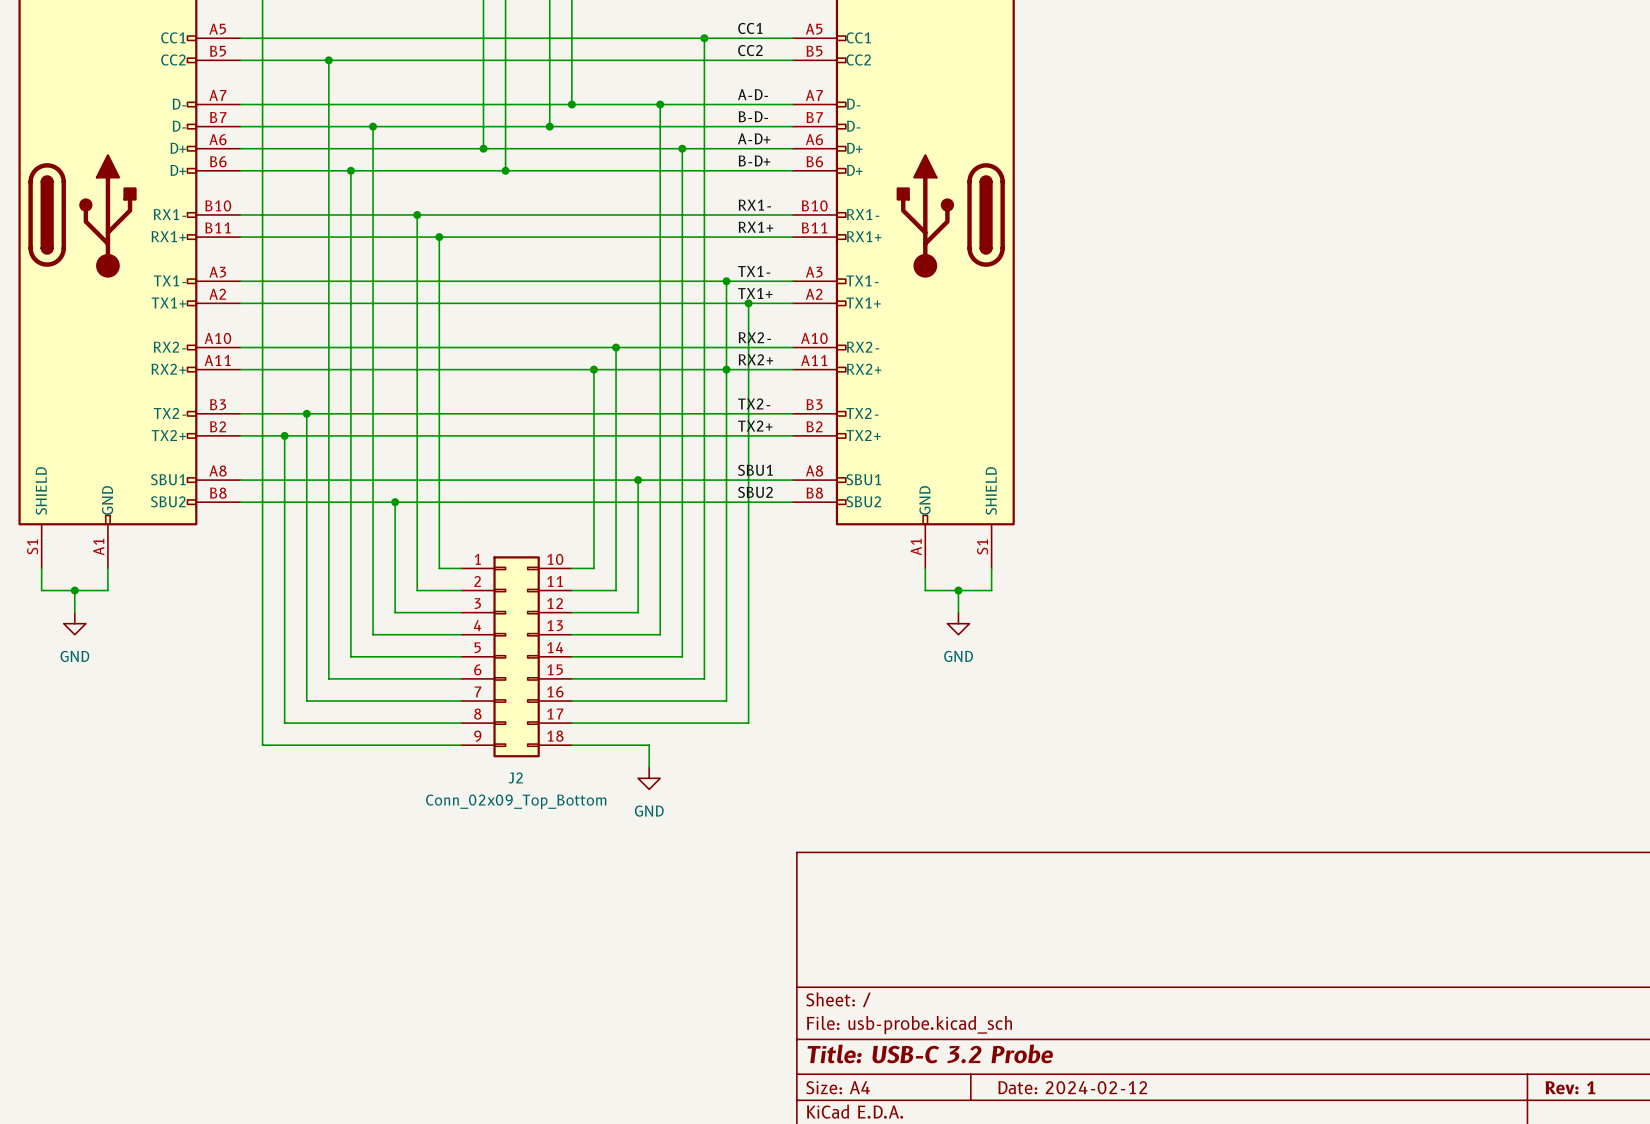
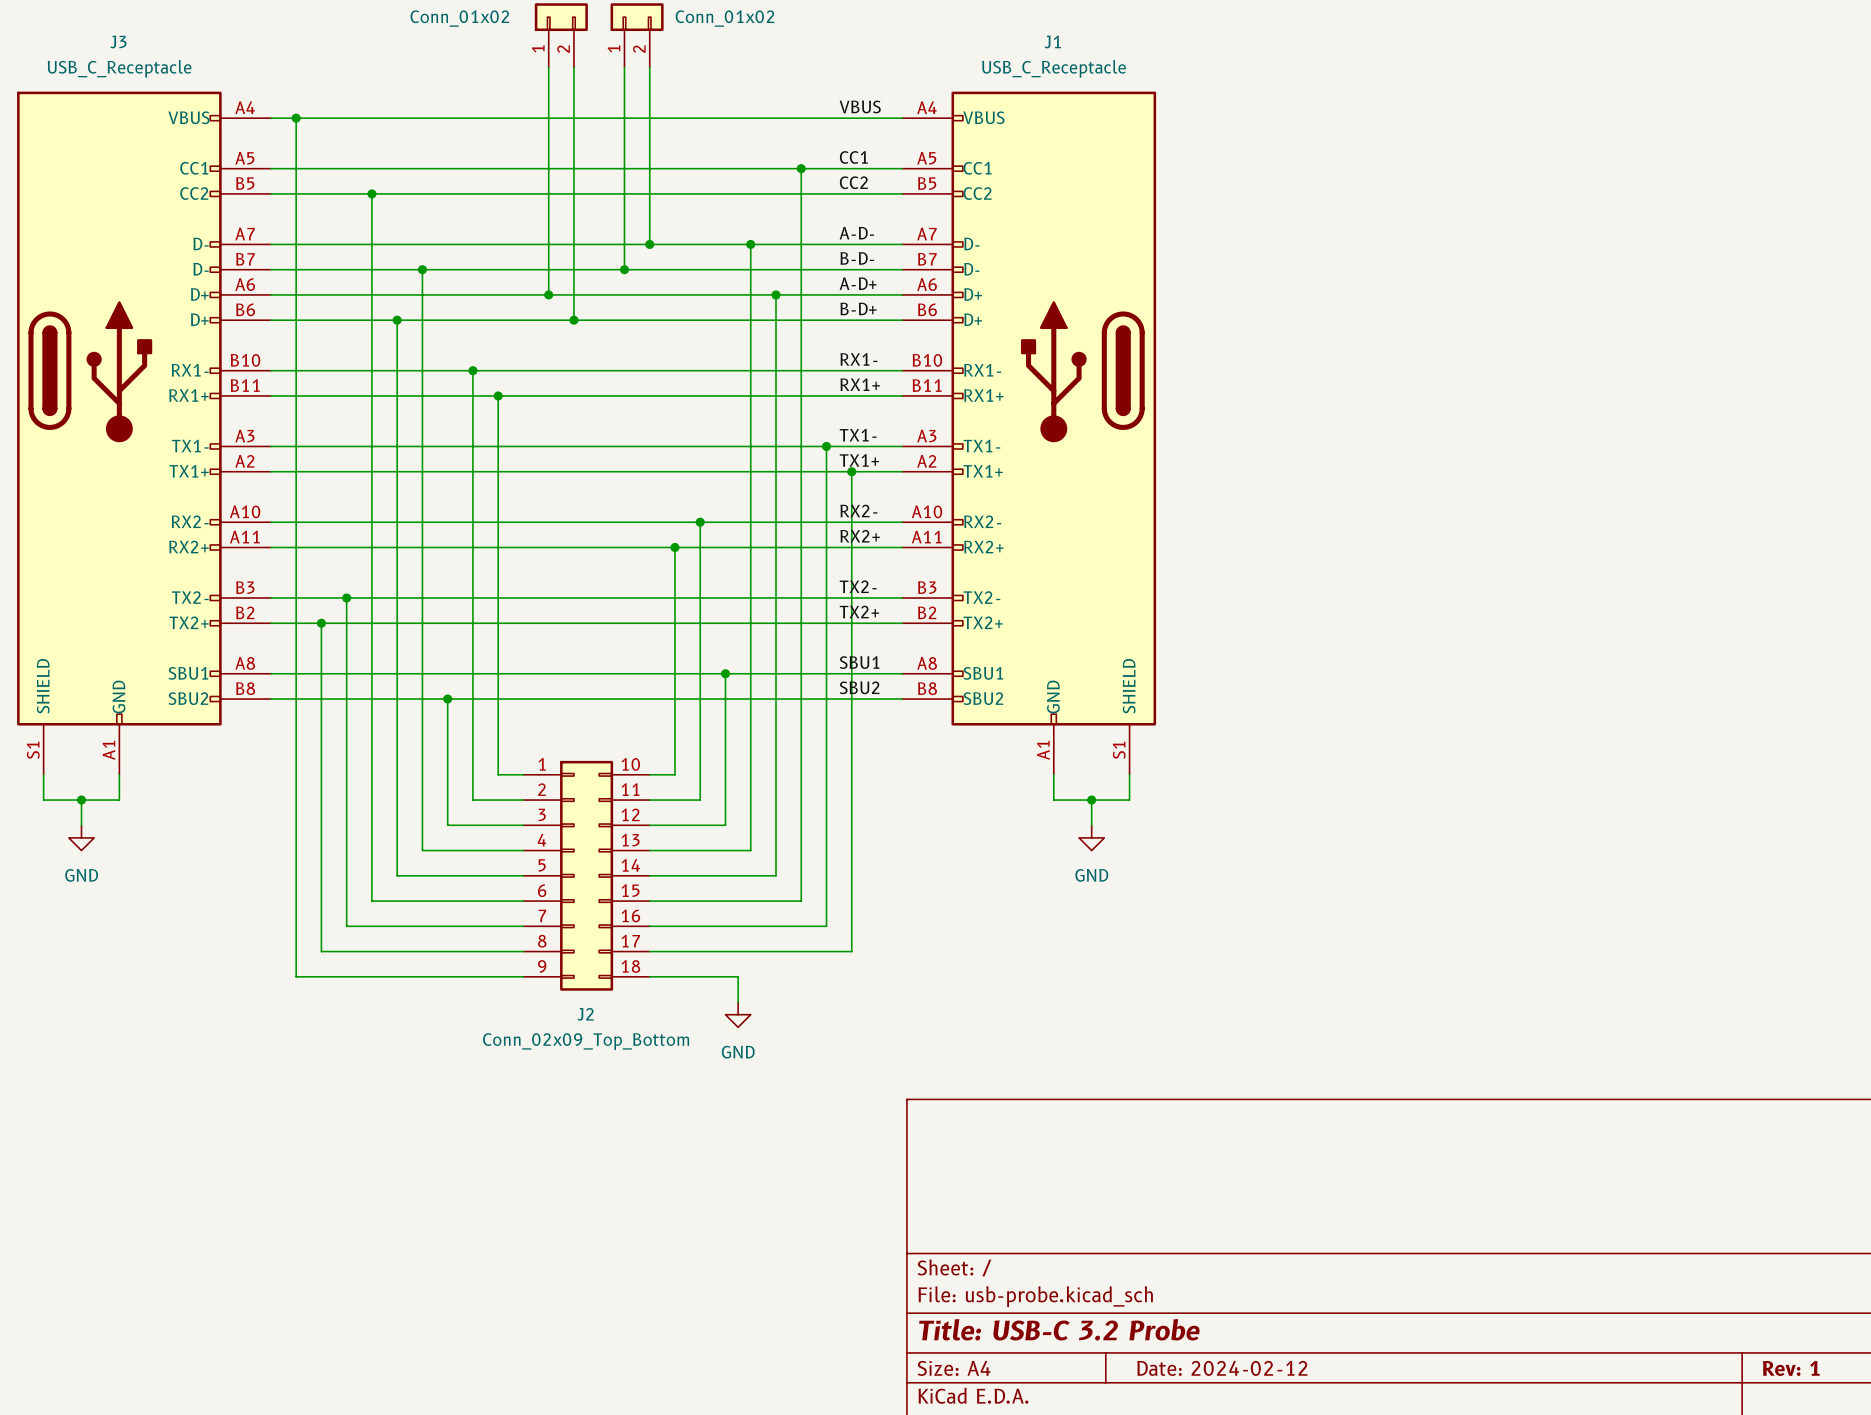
junction: (726, 369) -> none

